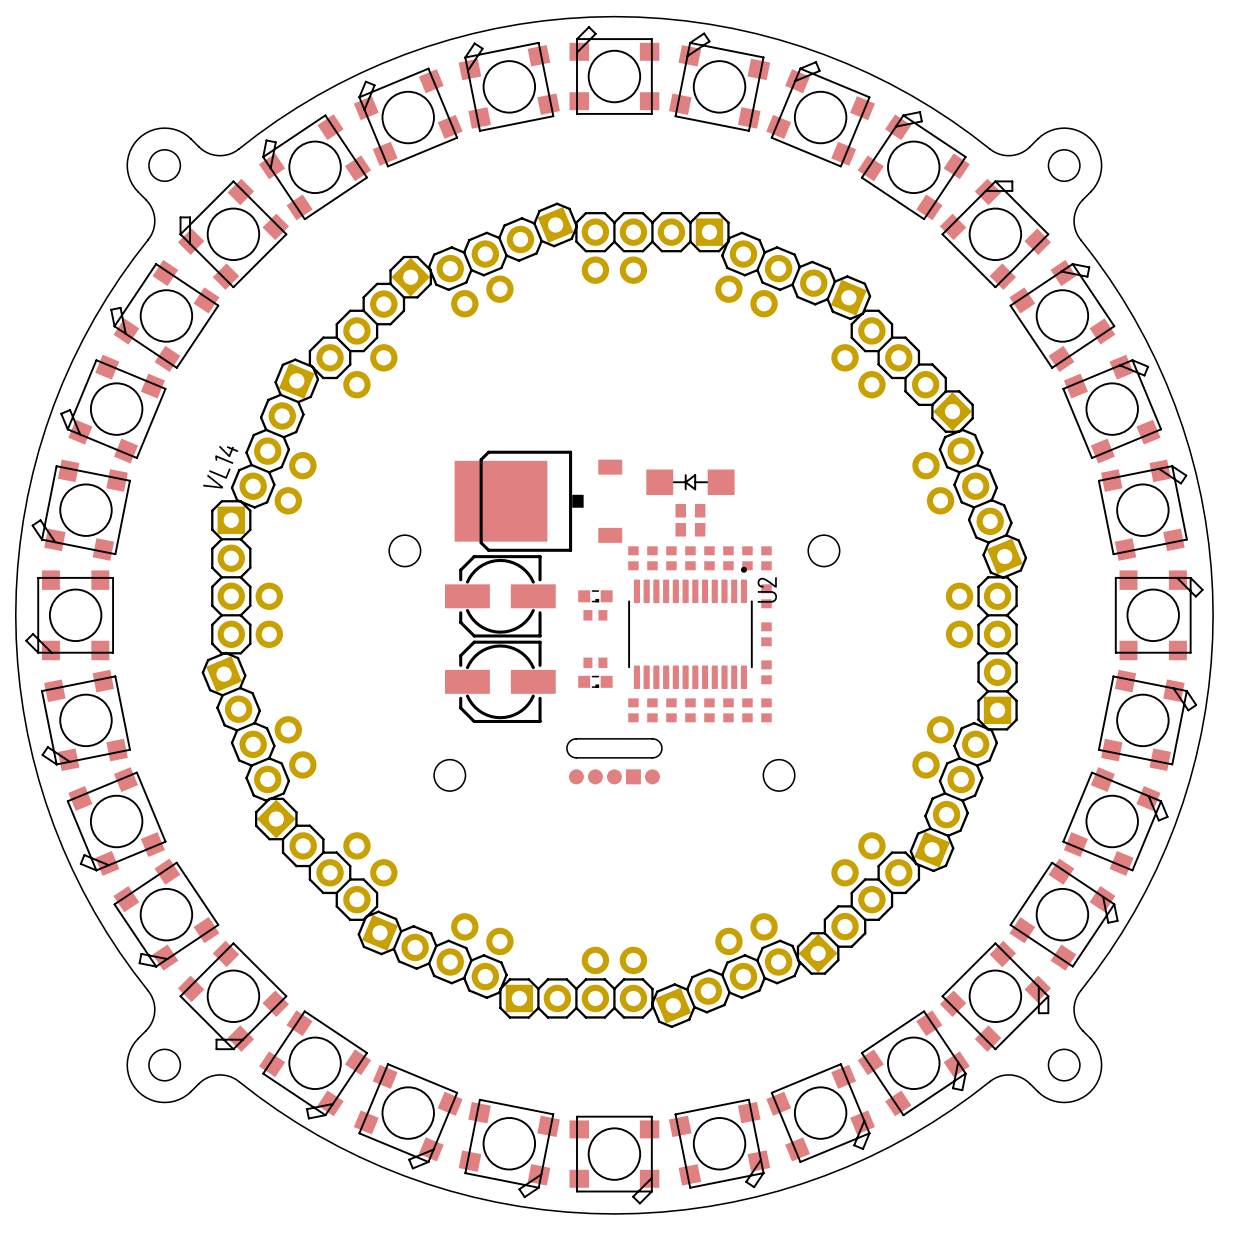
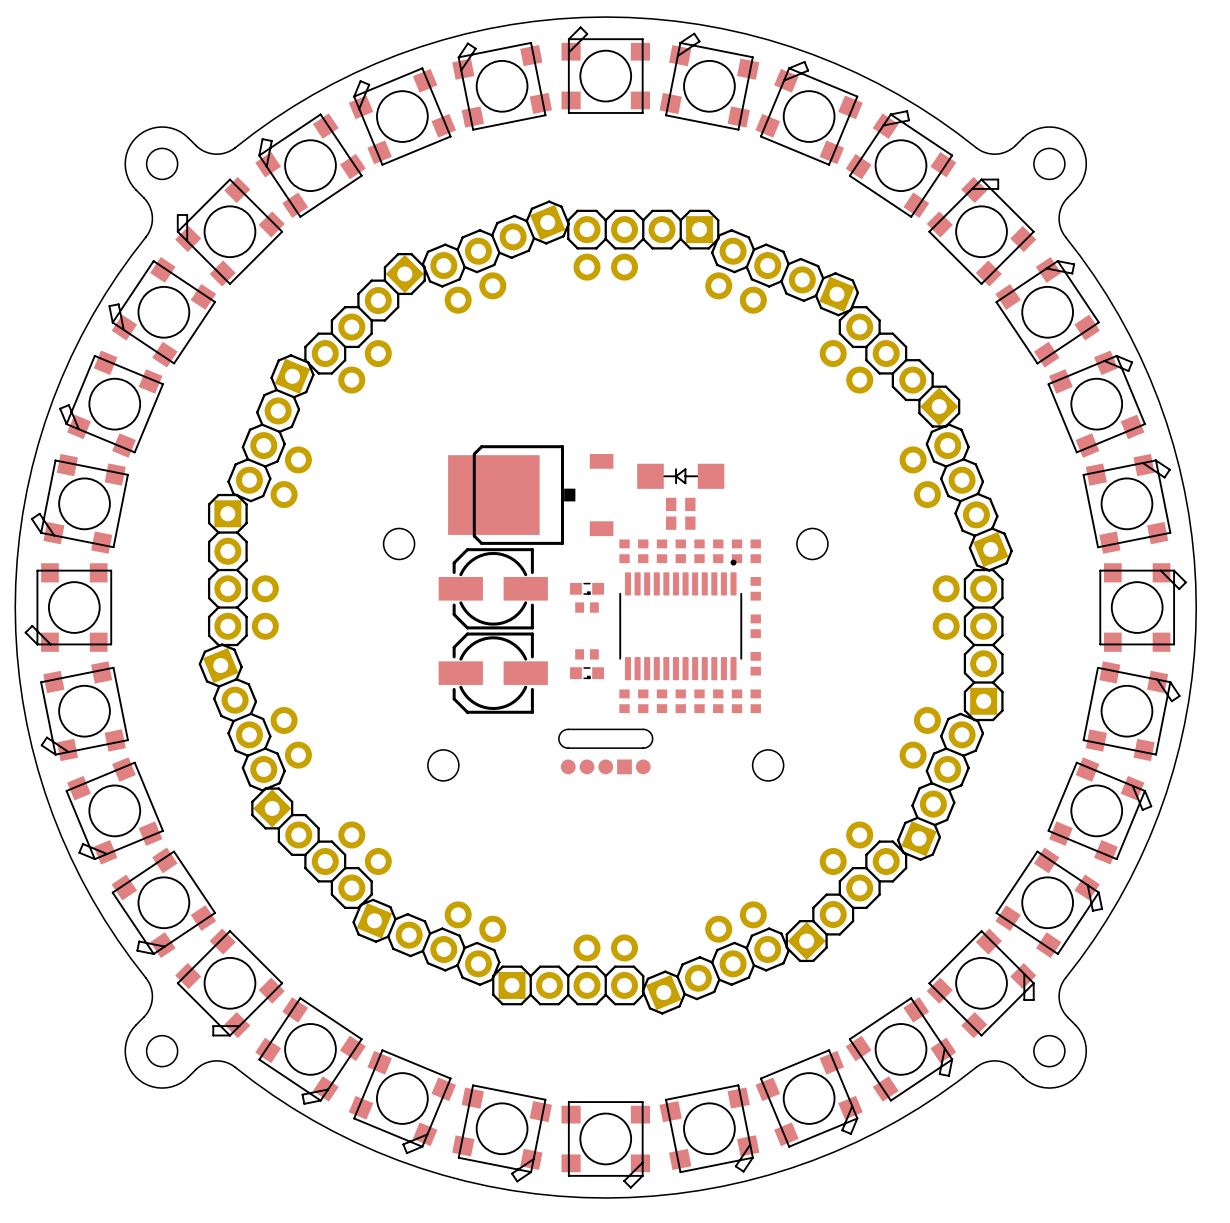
VL14 name: VL14 (220, 467) -> none
U2 name: U2 (767, 589) -> none

